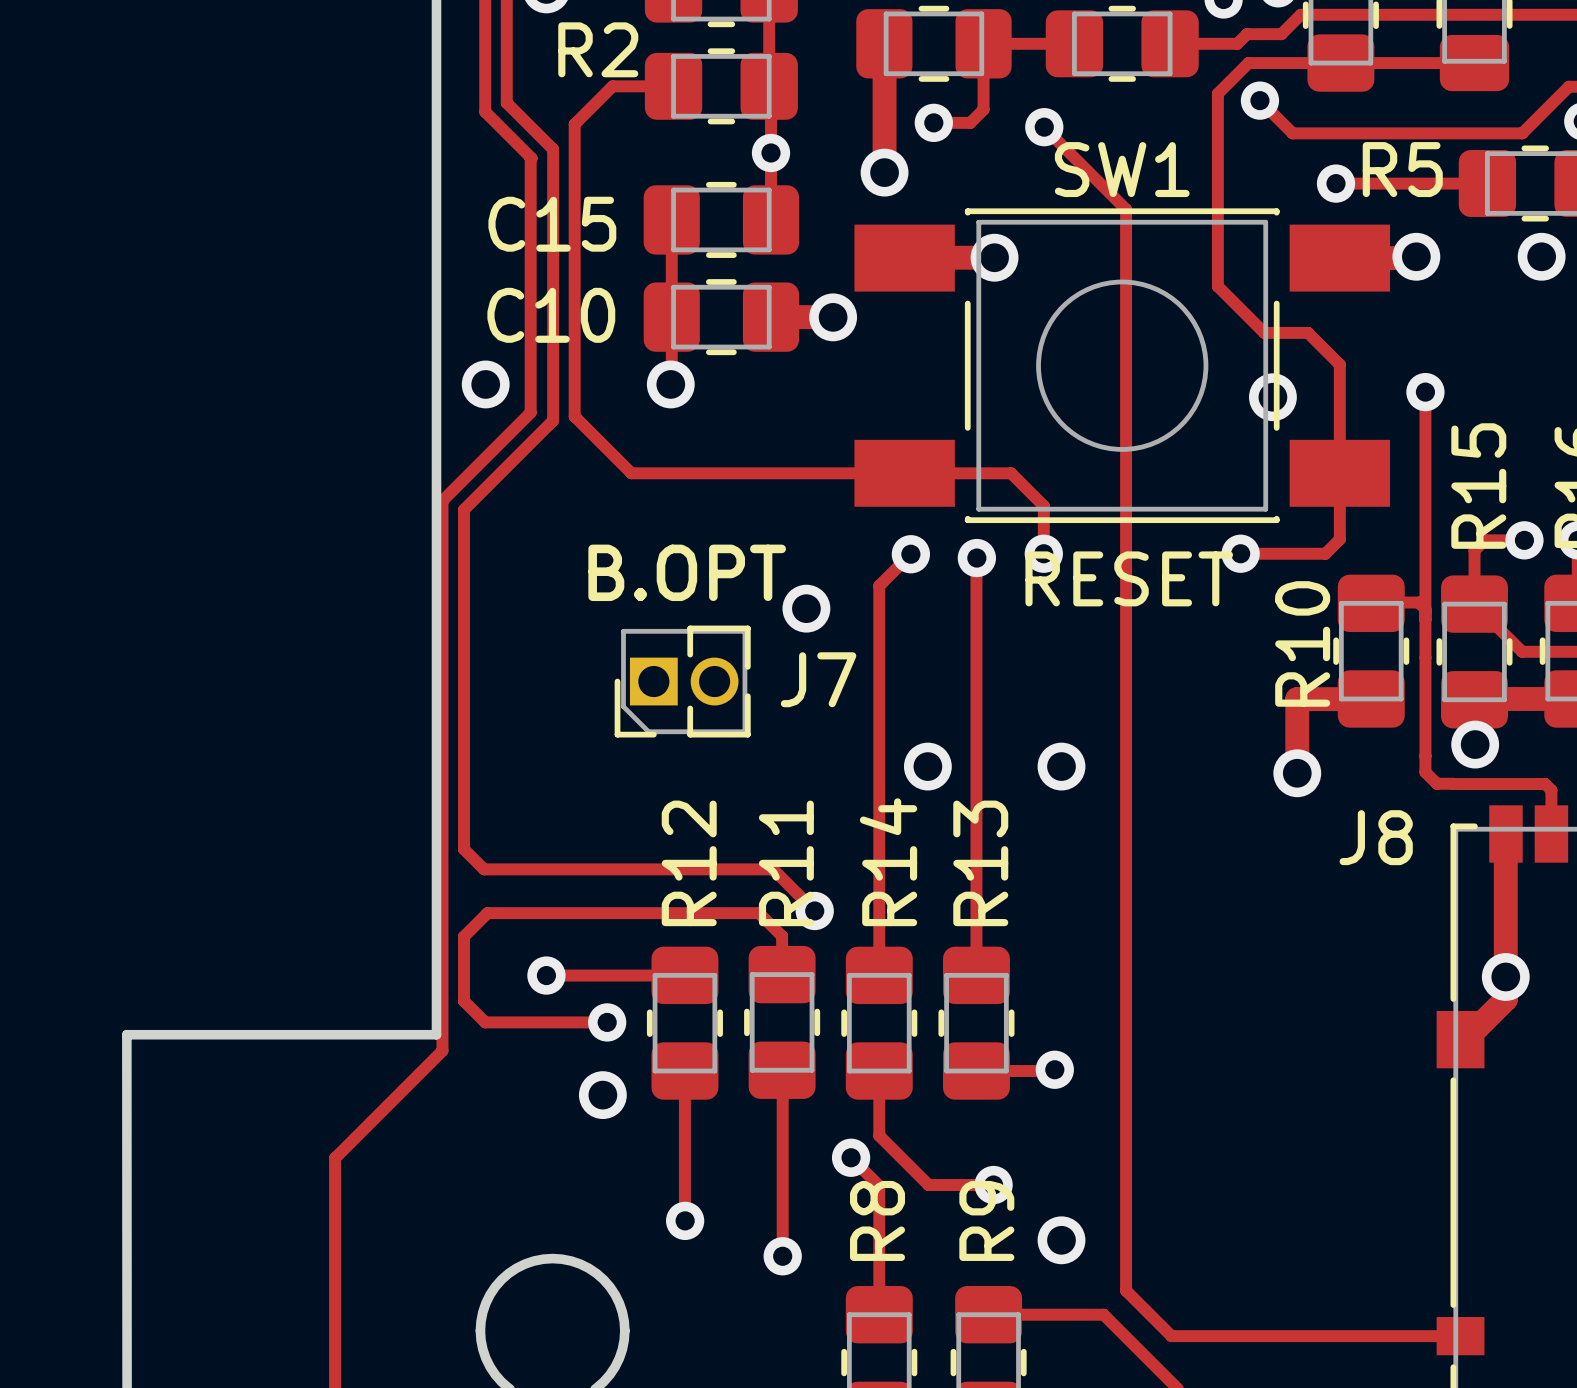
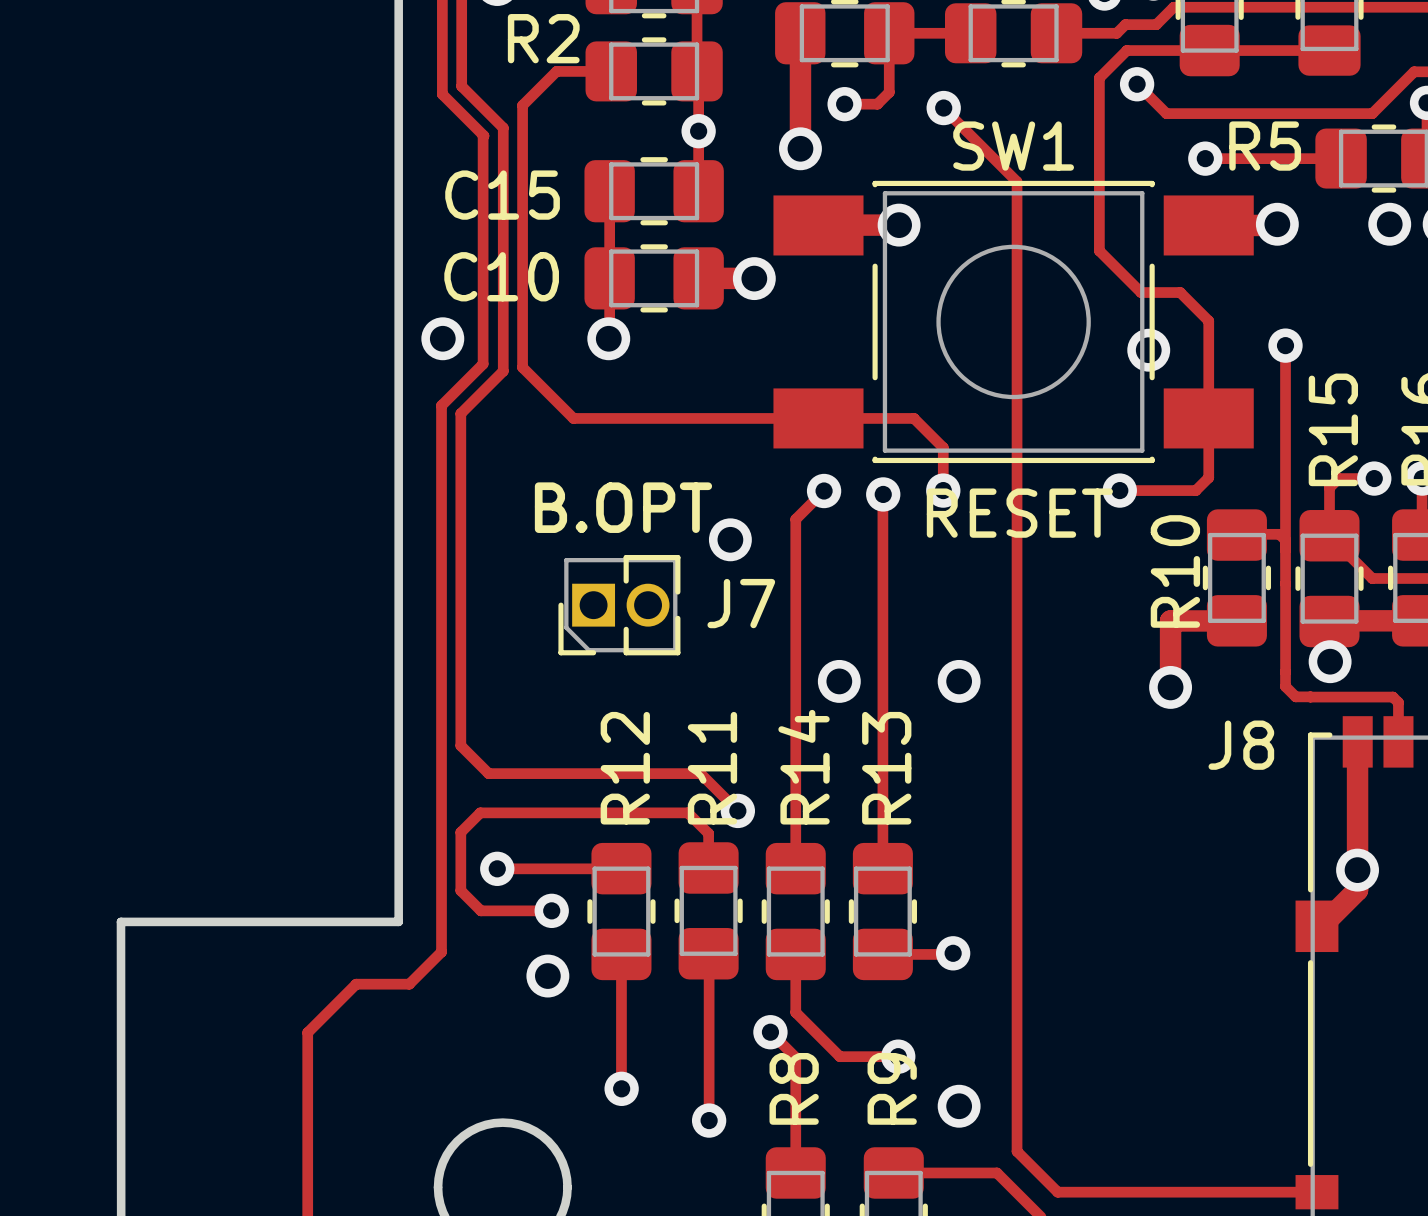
track: (484, 459) (442, 500) (442, 1050) (389, 1104) -> (441, 405) (441, 952) (409, 984) (356, 984)
track: (505, 467) (464, 509) (464, 849) (484, 869) (536, 869) -> (460, 413) (460, 745) (488, 773)
track: (527, 913) (487, 913) (464, 936) (464, 1001) (485, 1022) (528, 1022) -> (480, 812) (460, 832) (460, 890) (480, 910)

